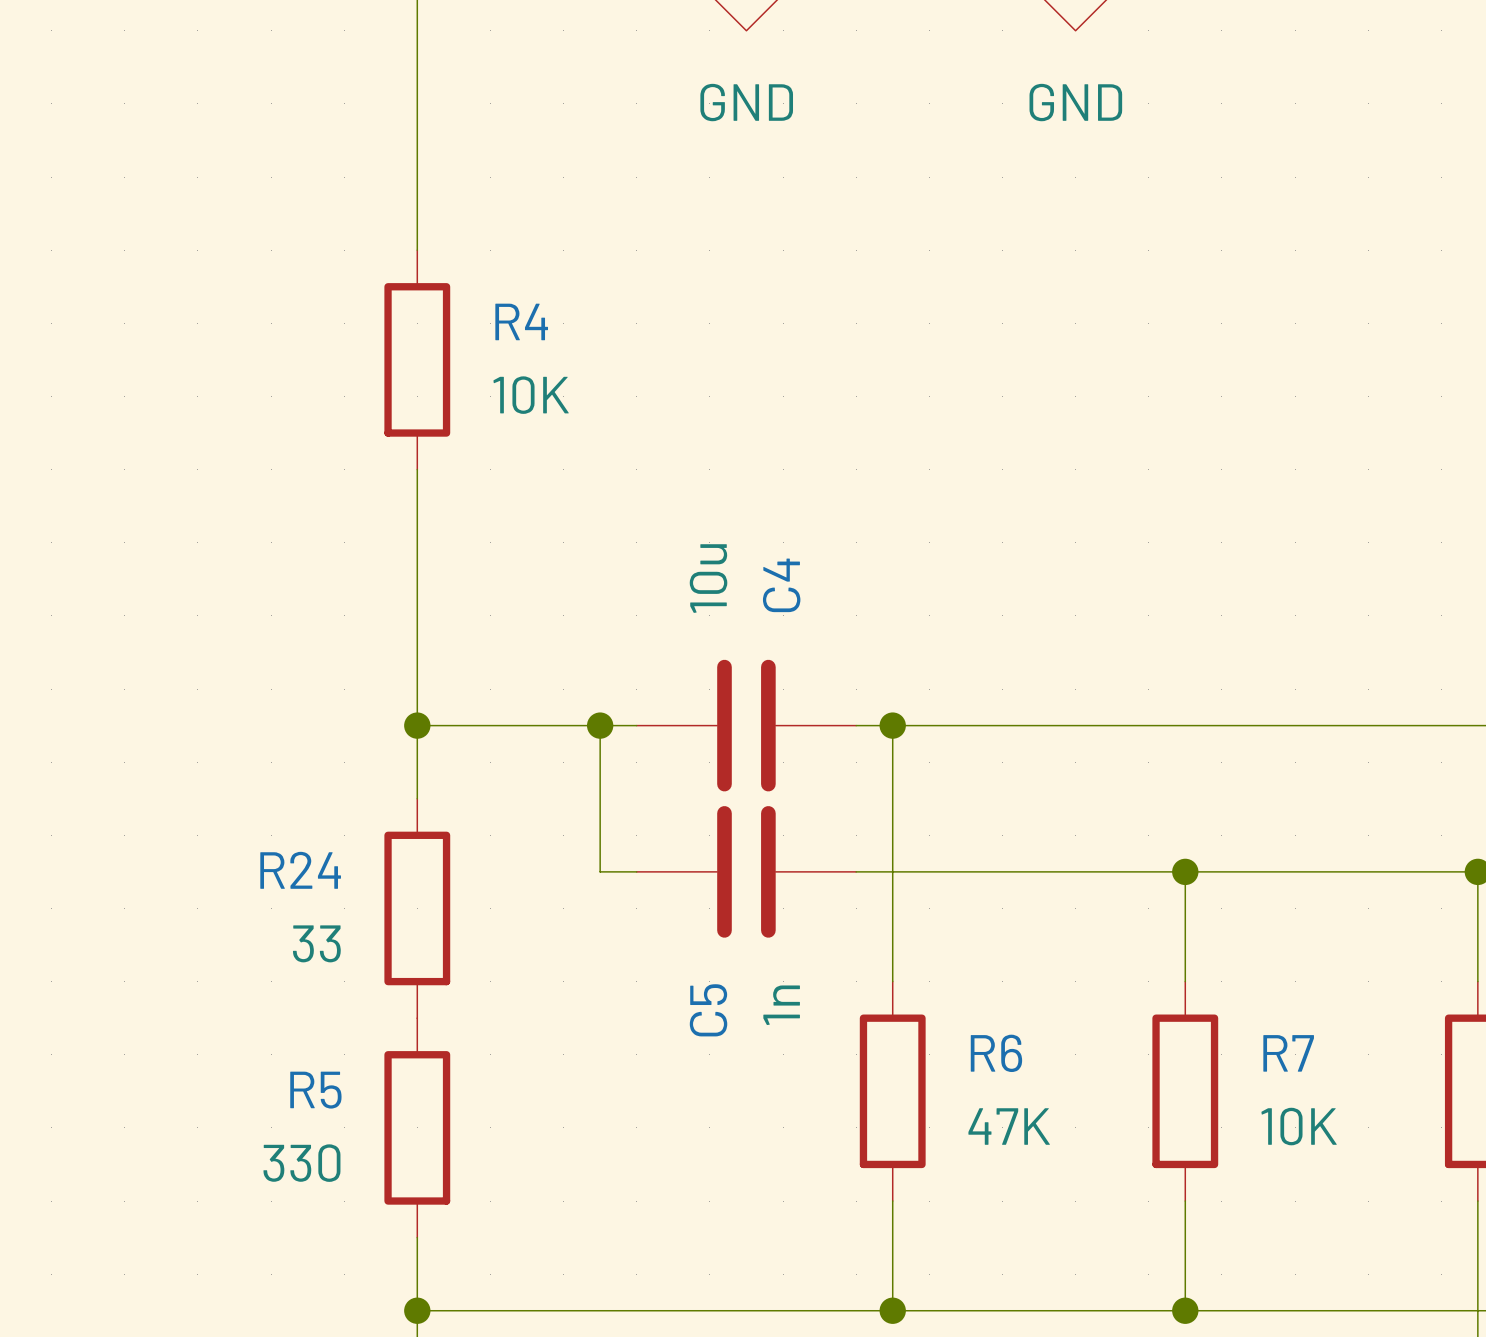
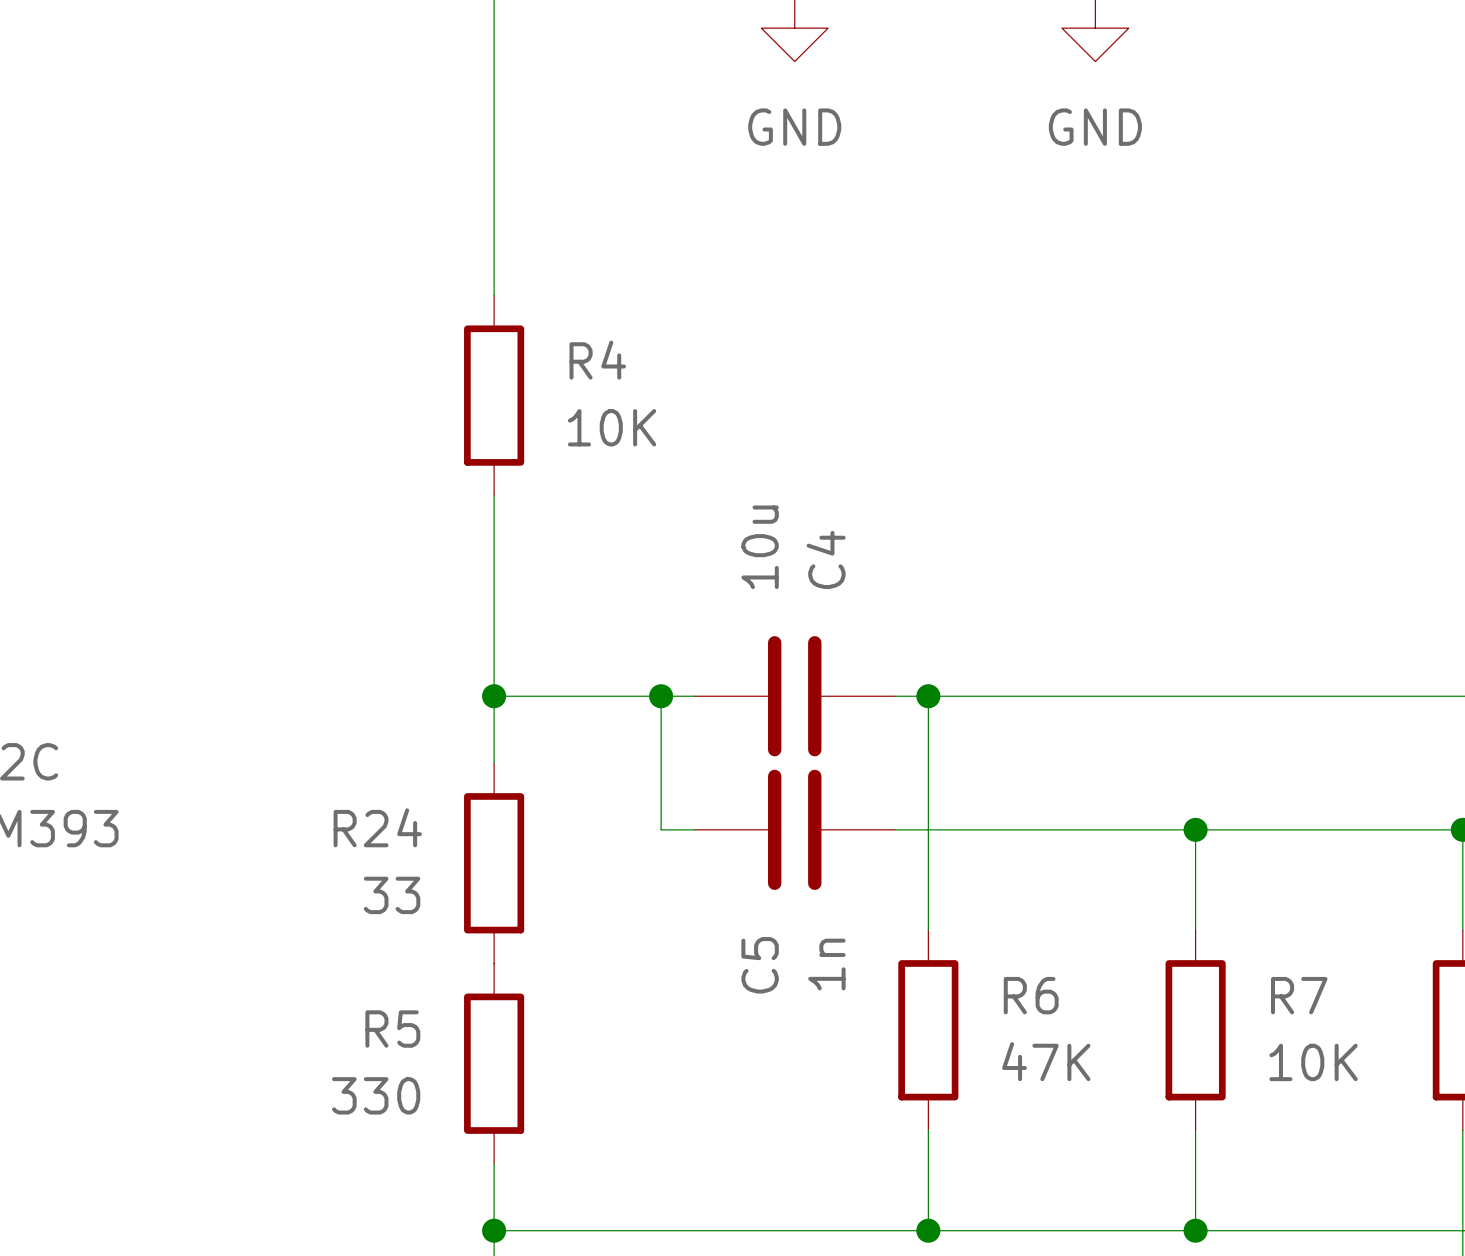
R4 position: (417, 359) -> (494, 395)

